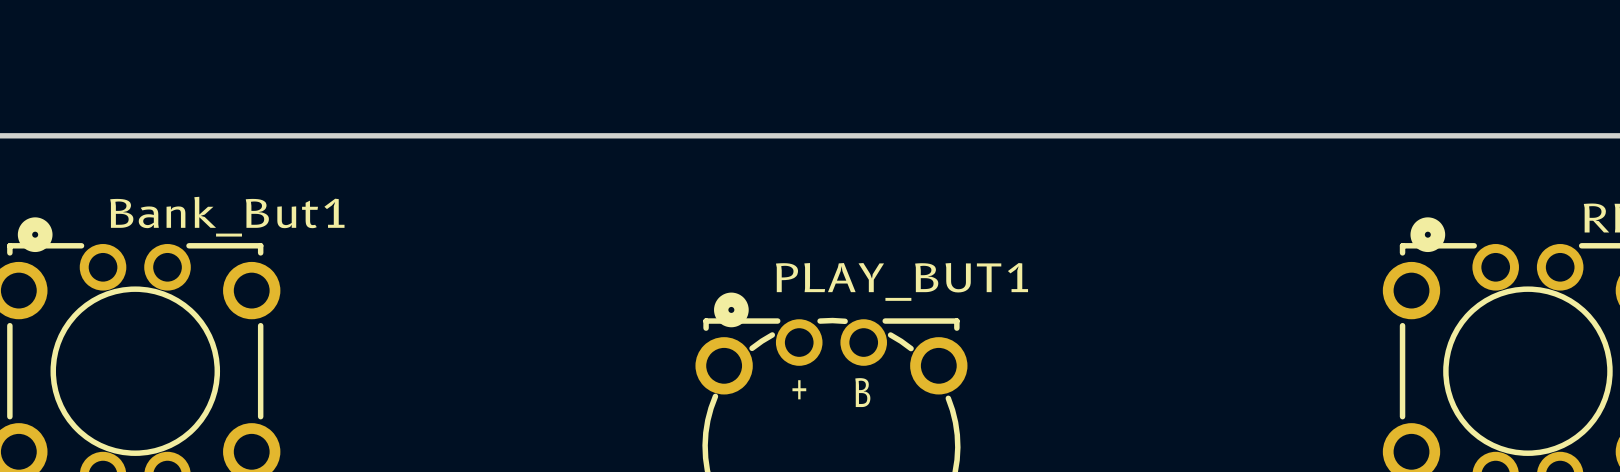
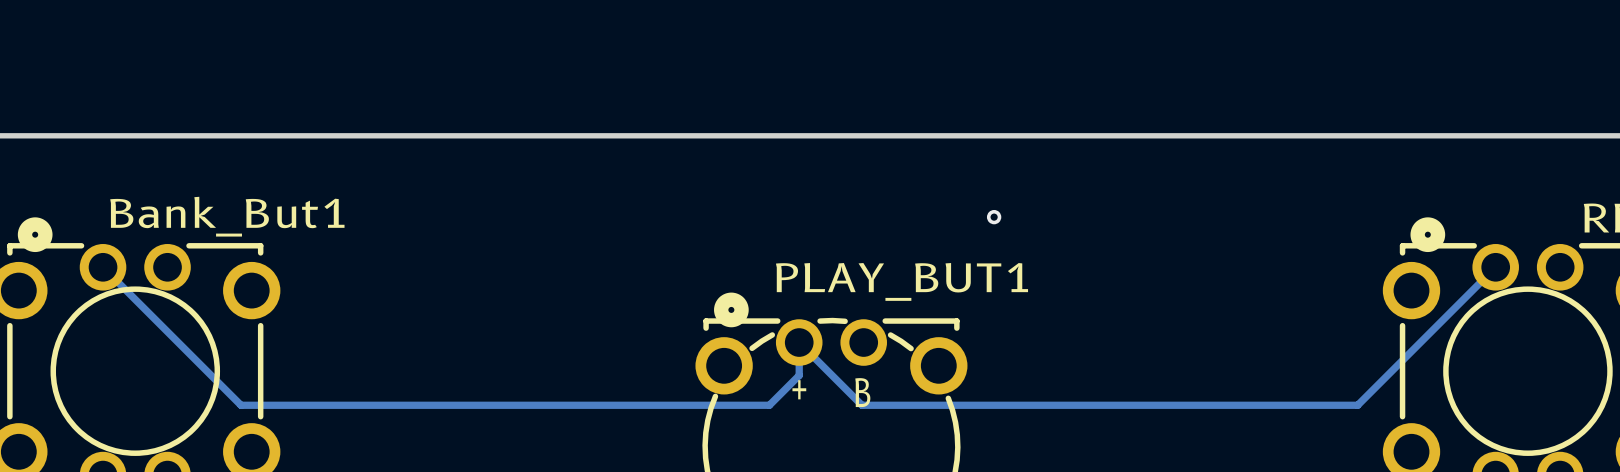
via: none -> (994, 217)
track: none -> (1495, 267) (1357, 405) (861, 405) (799, 342) (799, 375) (769, 405) (241, 405) (103, 267)

